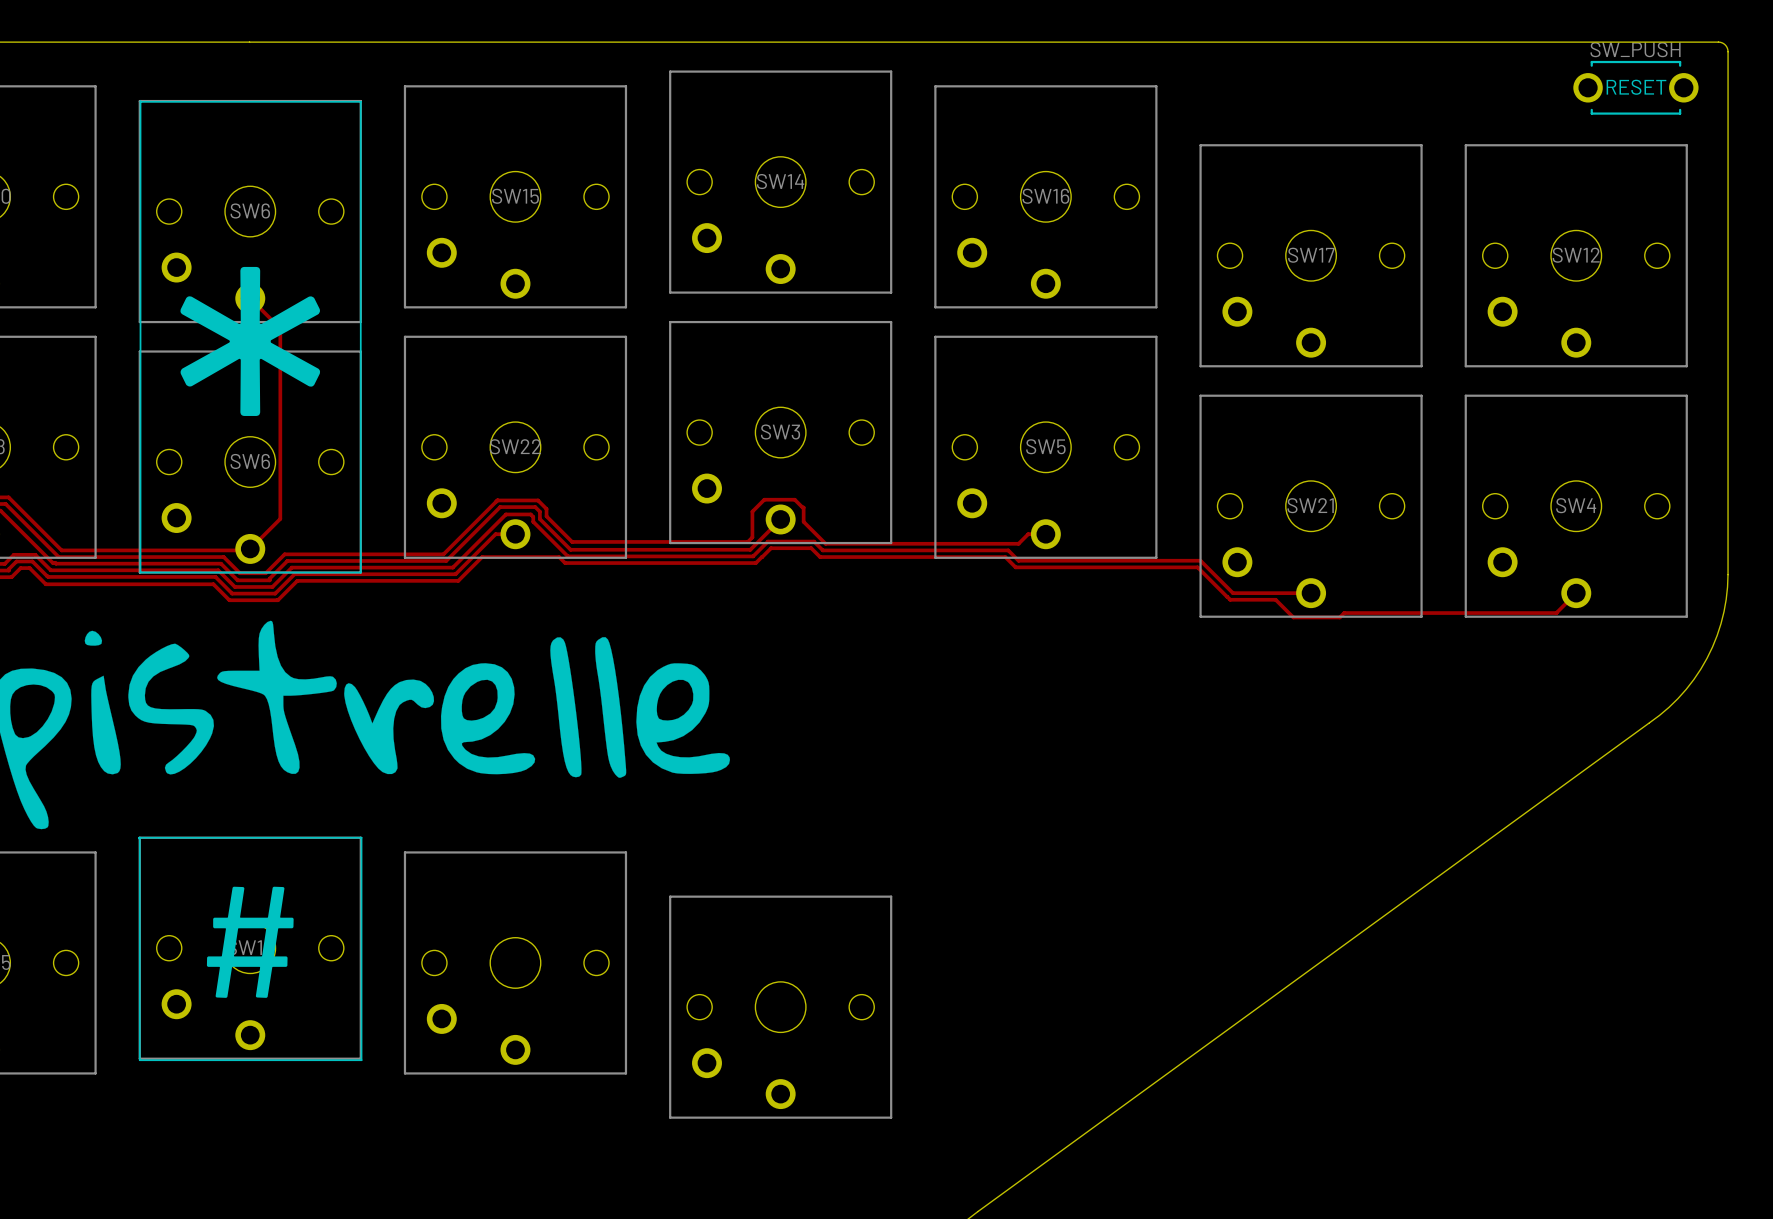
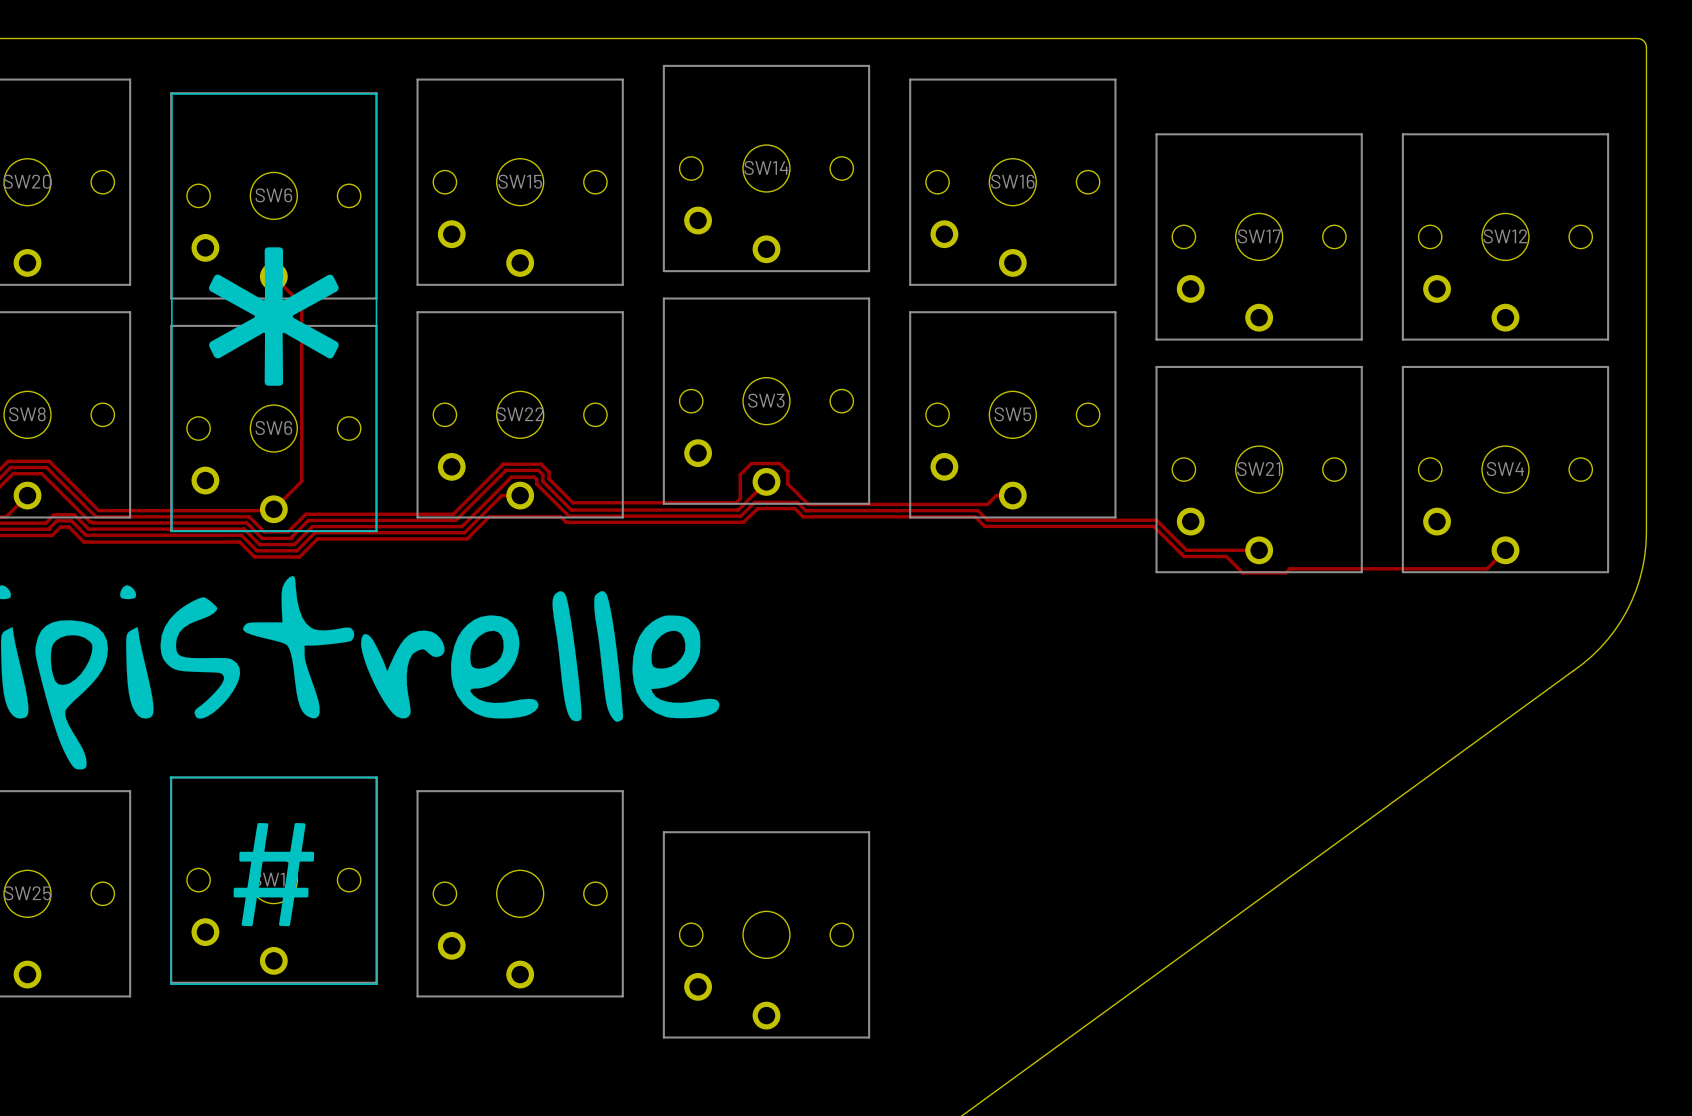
part: SW_PUSH (1635, 87) -> none

